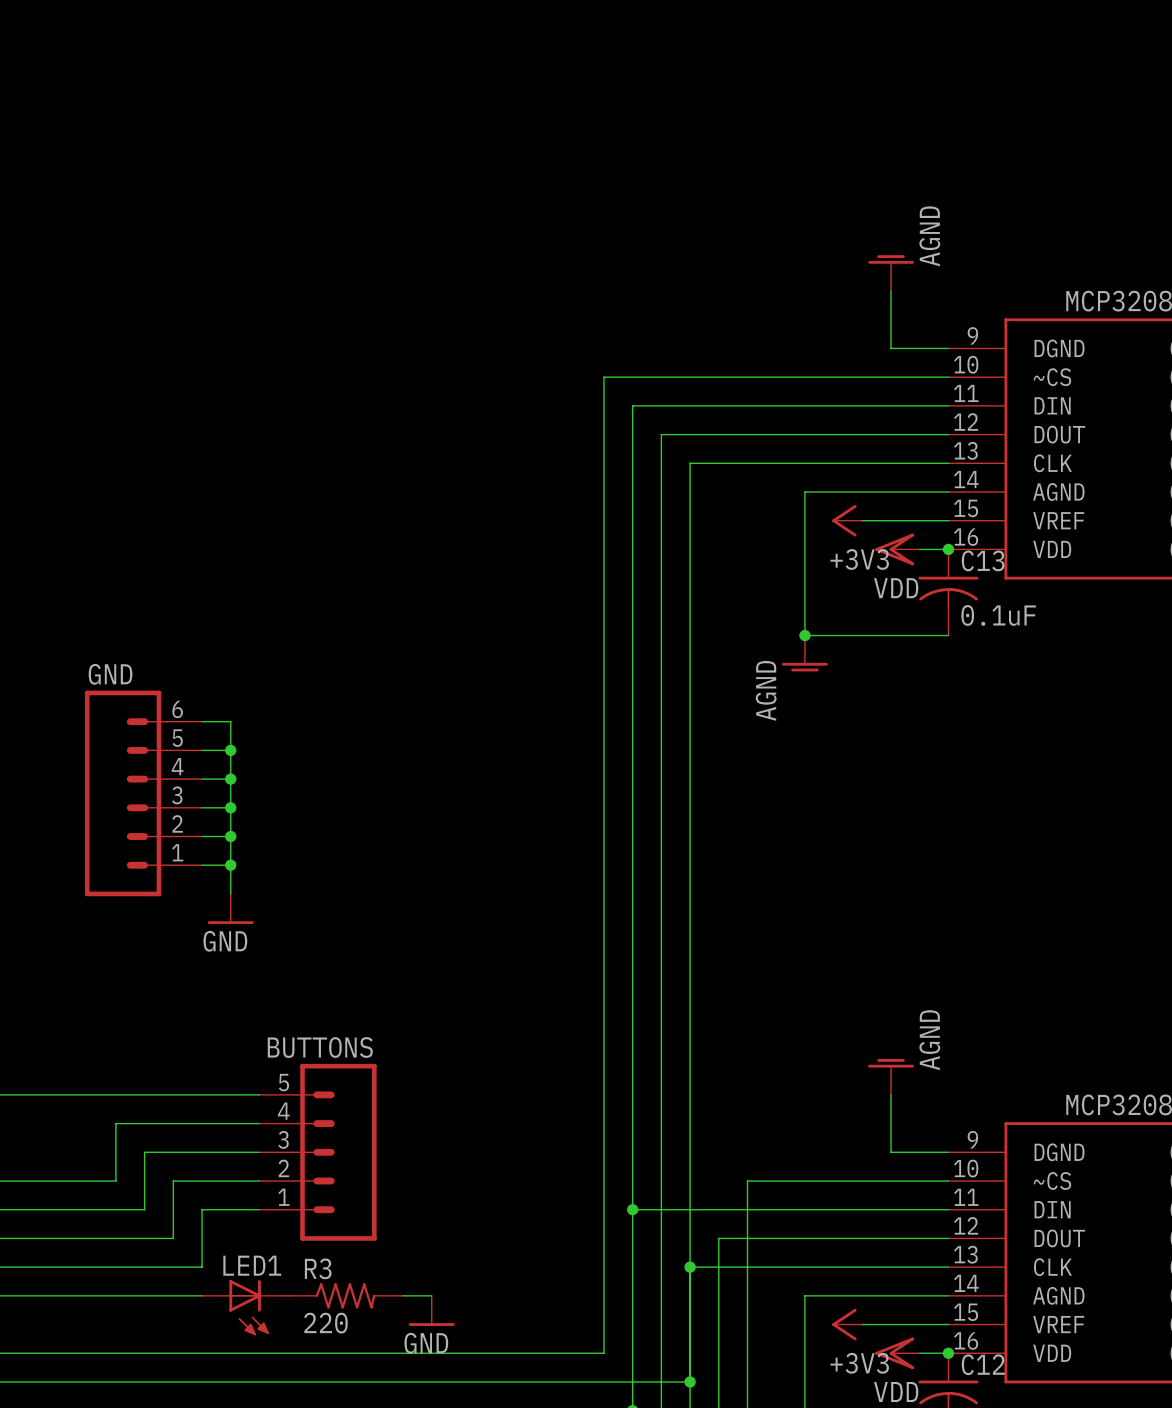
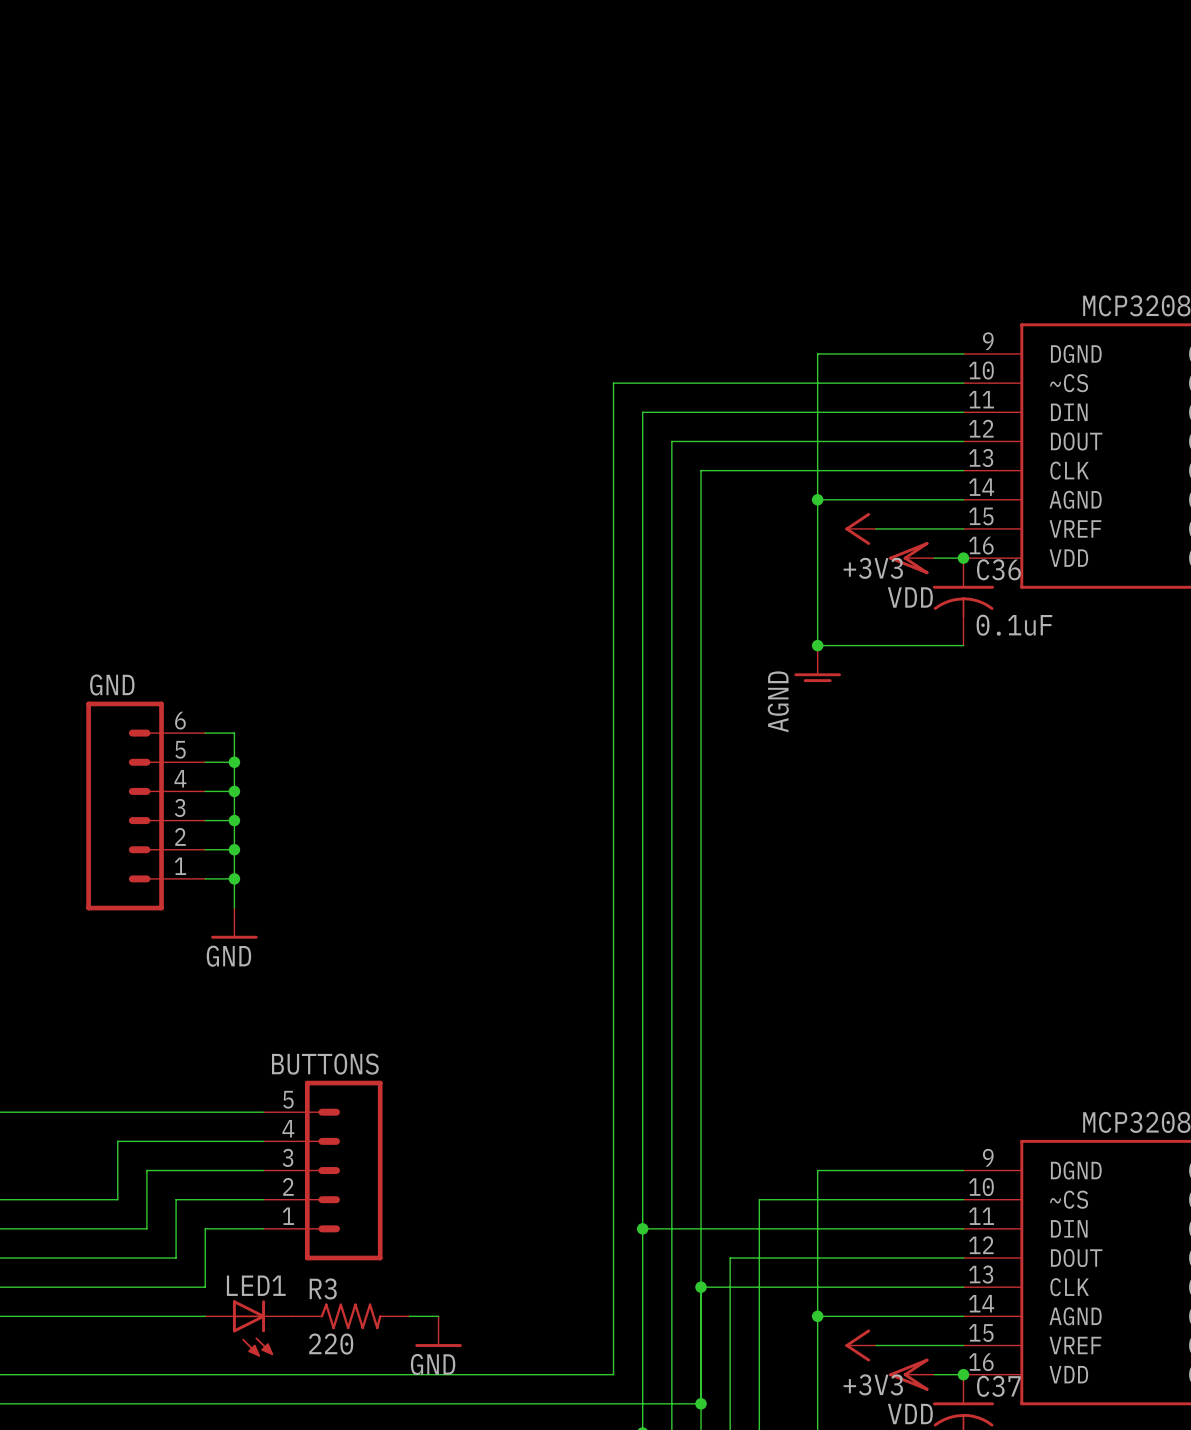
power symbol: AGND (891, 273) -> none
wire: (891, 291) (891, 348) -> (817, 499) (817, 353) (905, 353)
junction: none -> (817, 499)
C13 name: C13 (983, 560) -> C36 (998, 569)
power symbol: AGND (891, 1076) -> none
wire: (891, 1094) (891, 1152) -> (817, 1316) (817, 1170) (905, 1170)
junction: none -> (817, 1316)
C12 name: C12 (983, 1364) -> C37 (998, 1386)

